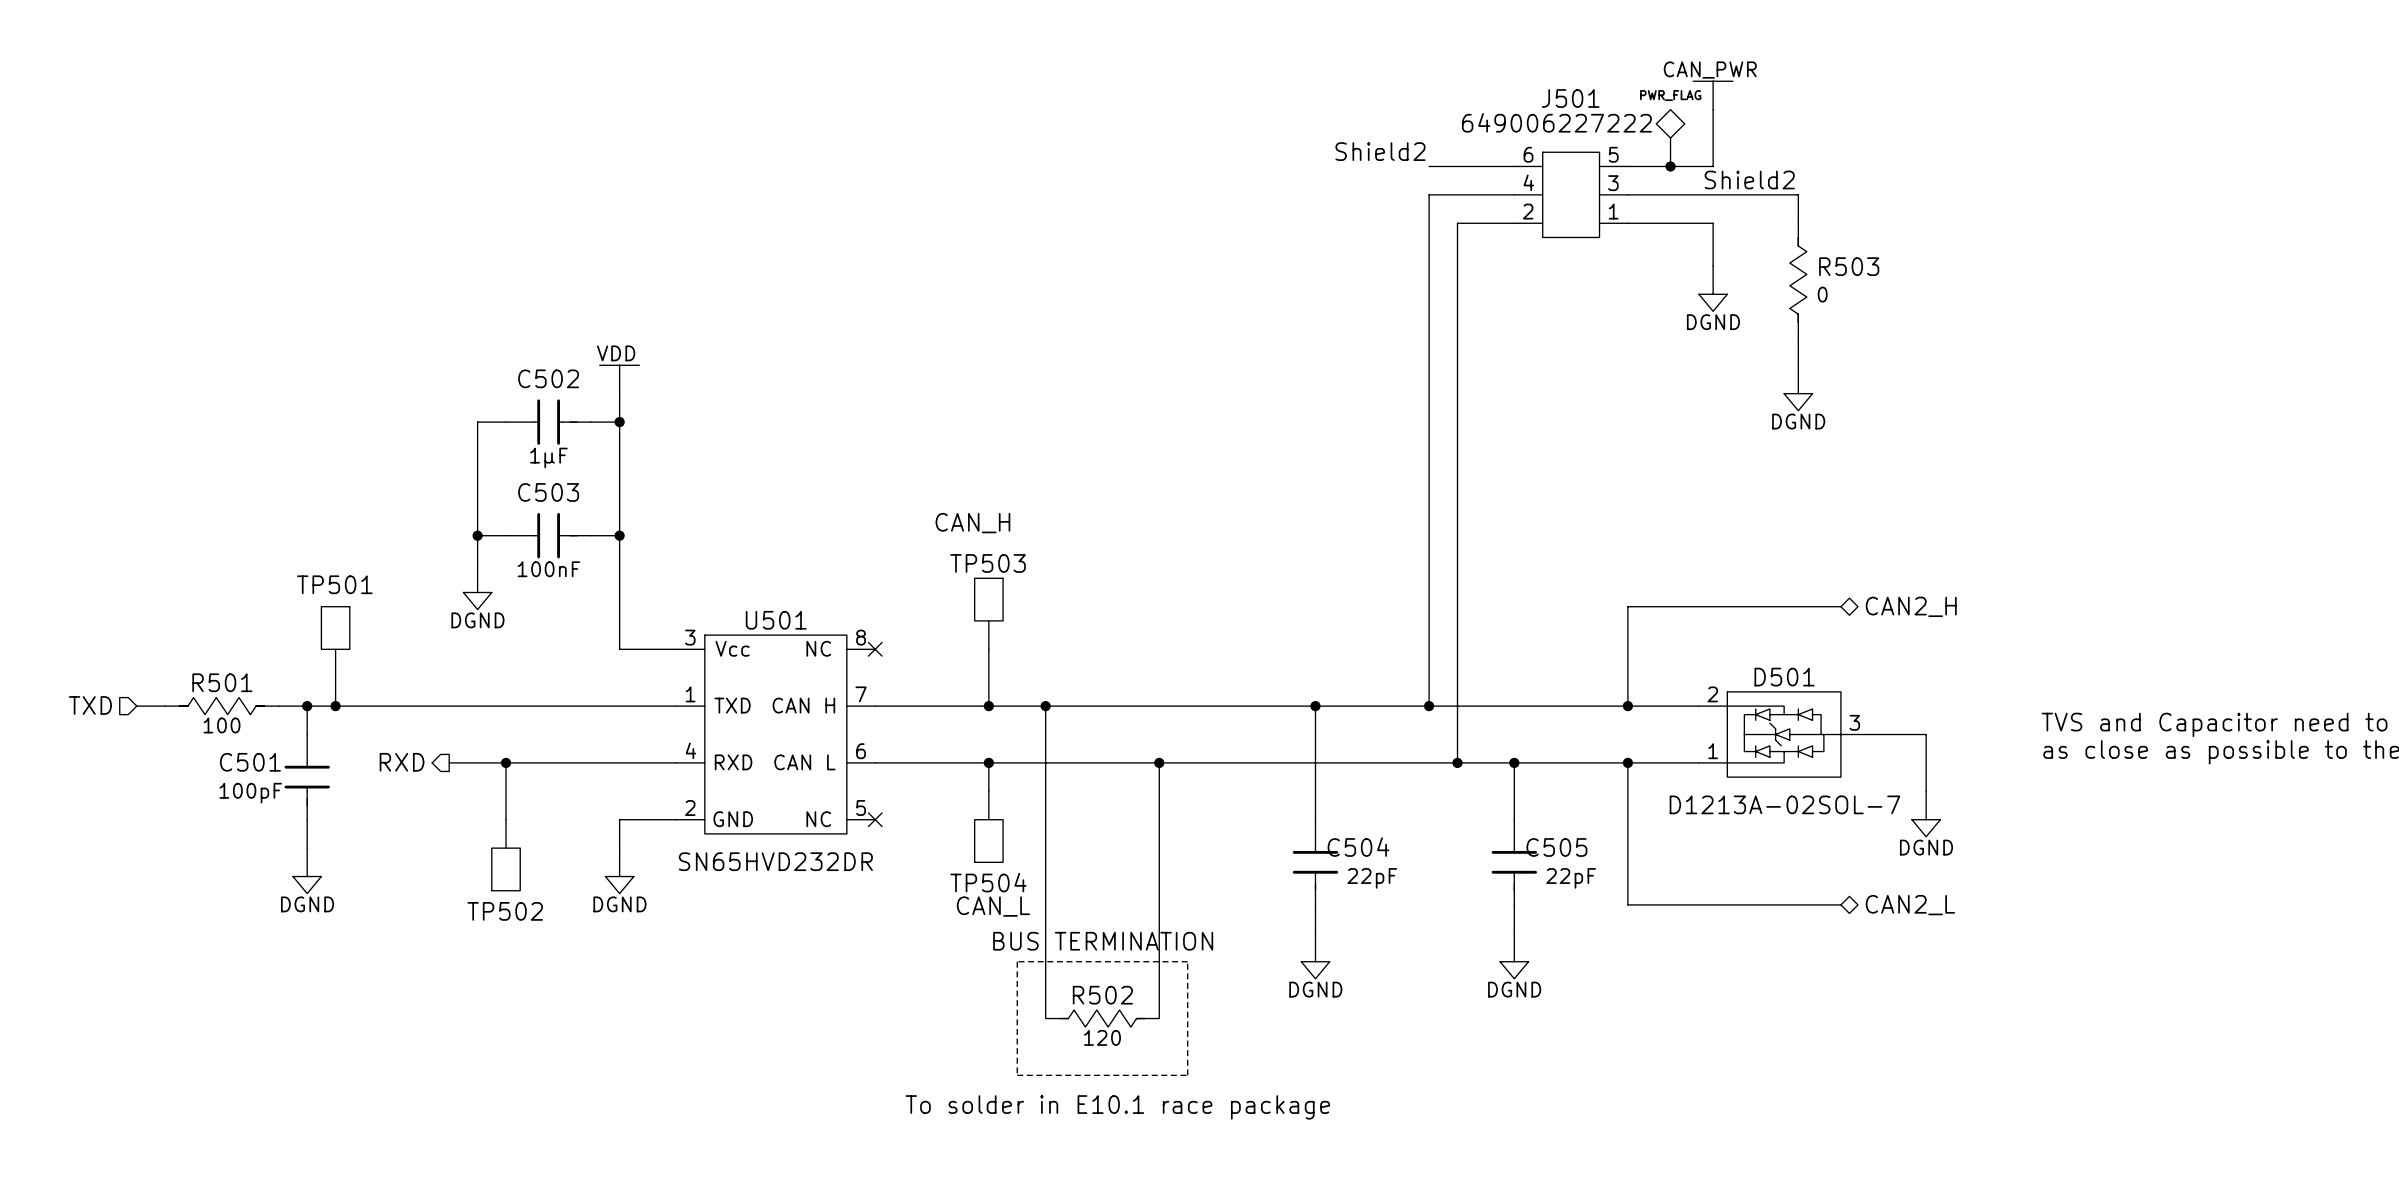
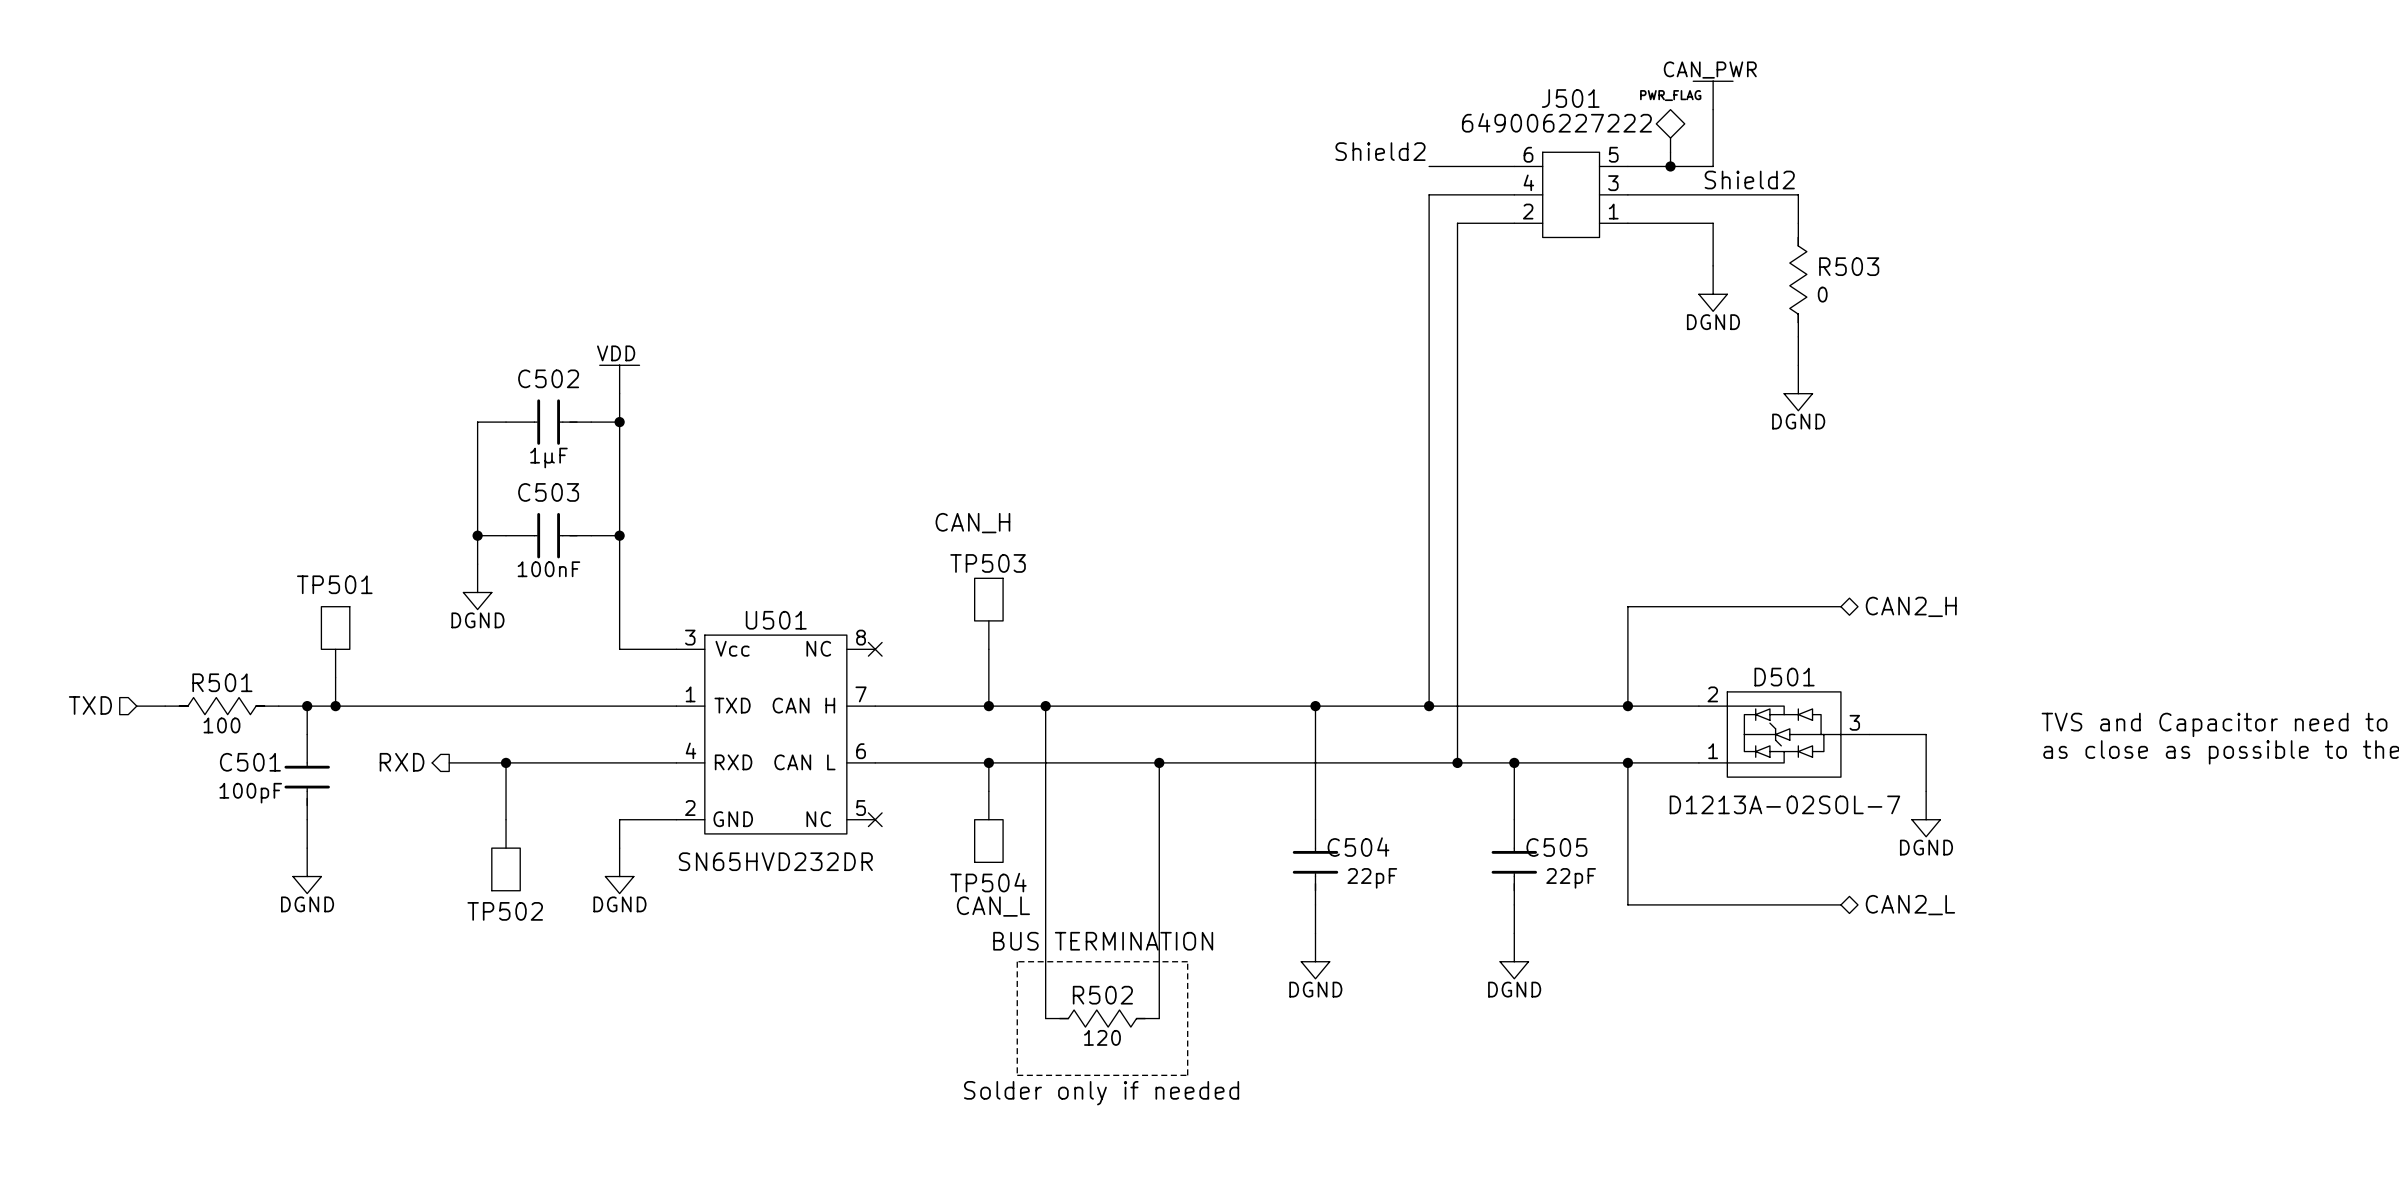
text: none -> Solder only if needed (1101, 1093)
text: To solder in E10.1 race package (1117, 1107) -> none

